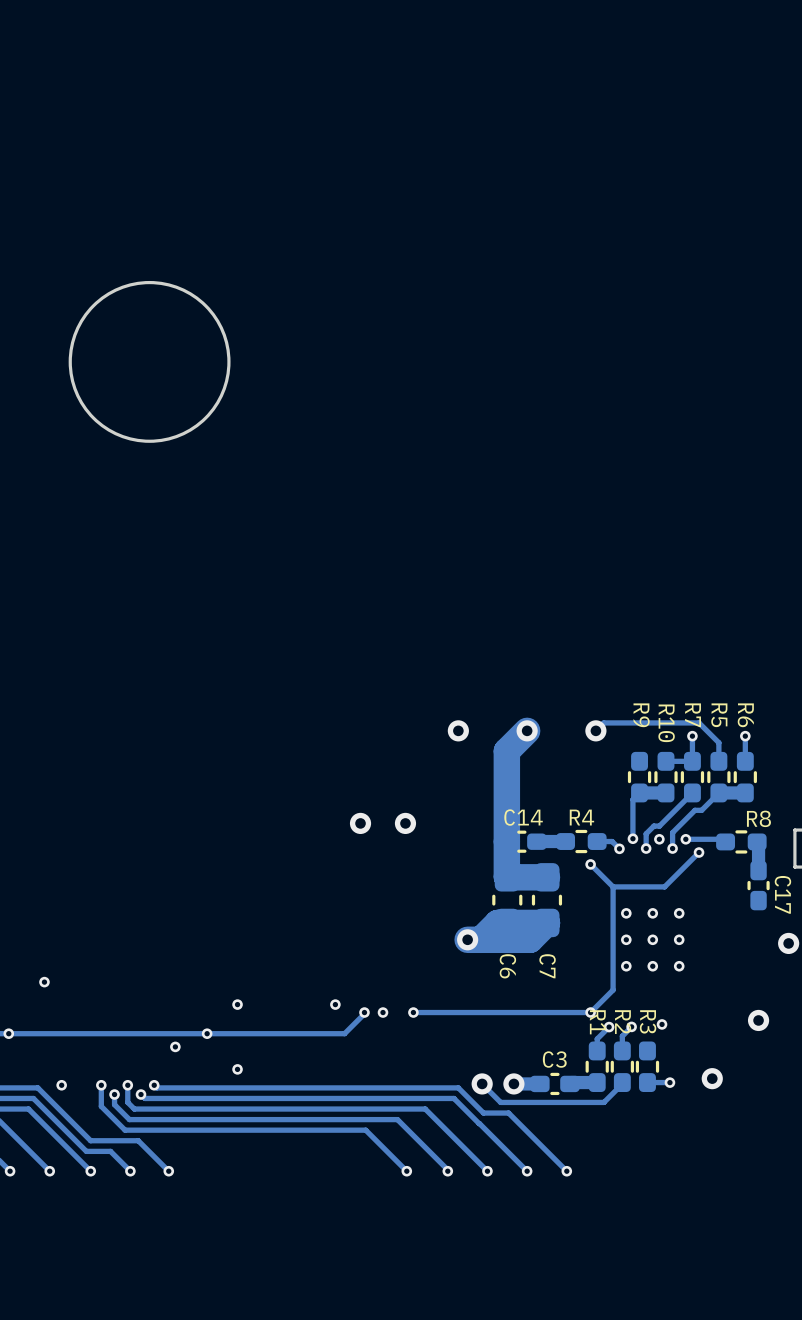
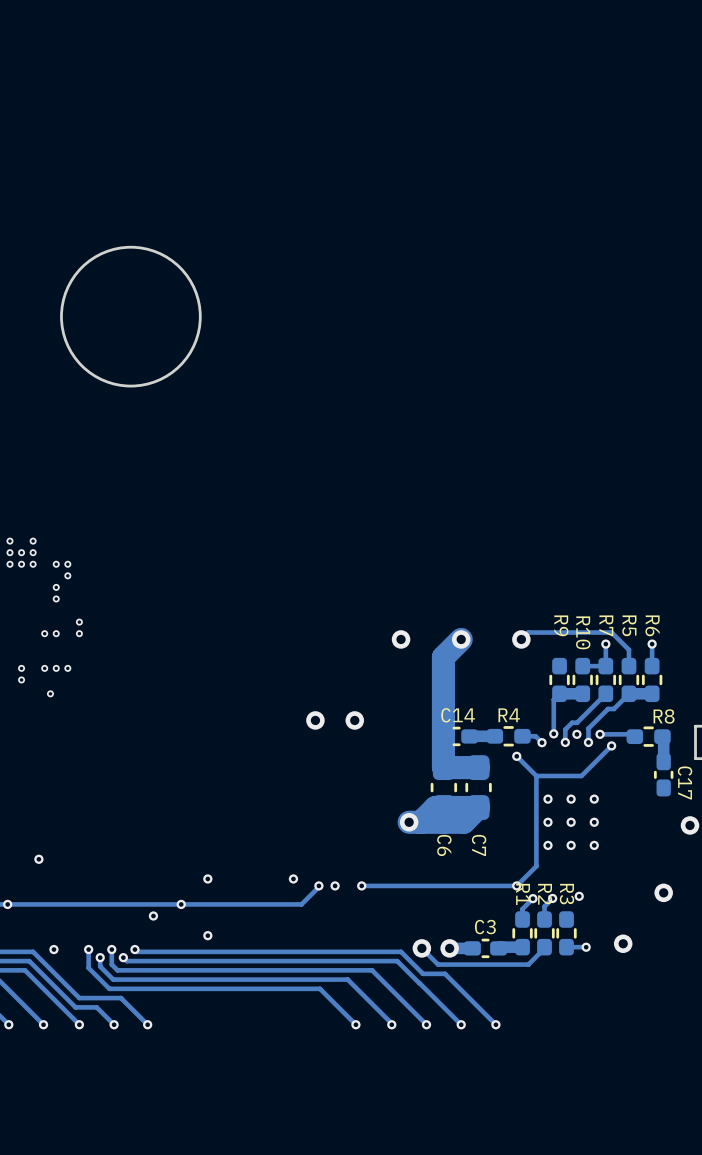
via: none -> (9, 541)
via: none -> (33, 541)
via: none -> (9, 552)
via: none -> (21, 552)
via: none -> (33, 552)
via: none -> (9, 564)
via: none -> (21, 564)
via: none -> (33, 564)
via: none -> (56, 564)
via: none -> (67, 564)
via: none -> (67, 575)
via: none -> (56, 587)
via: none -> (56, 598)
via: none -> (79, 622)
via: none -> (44, 633)
via: none -> (56, 633)
via: none -> (79, 633)
via: none -> (21, 668)
via: none -> (44, 668)
via: none -> (56, 668)
via: none -> (67, 668)
via: none -> (21, 679)
via: none -> (50, 693)

